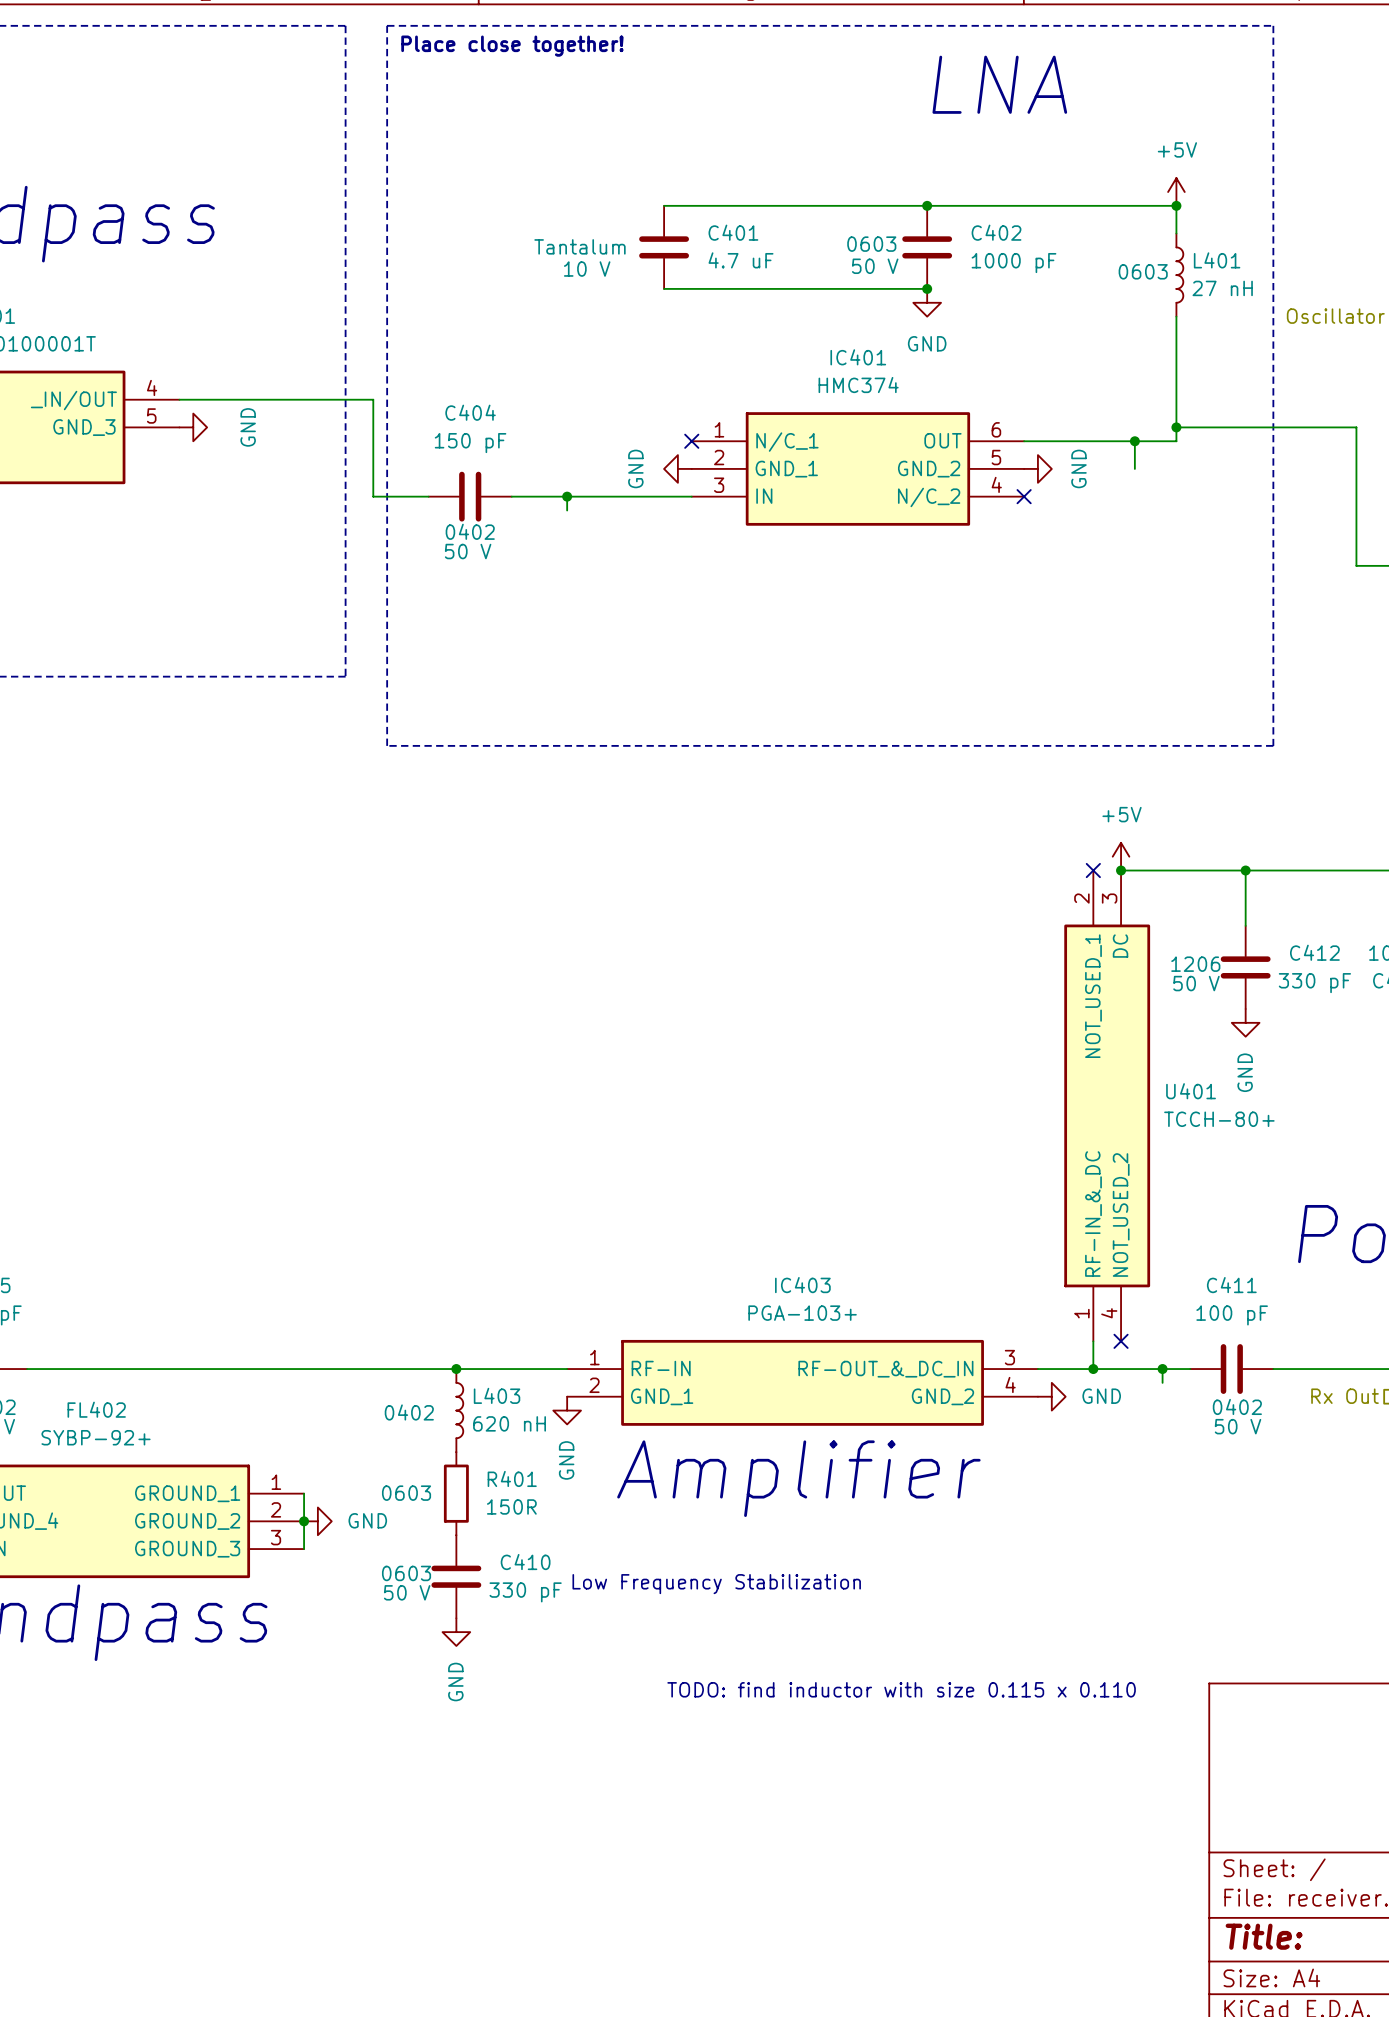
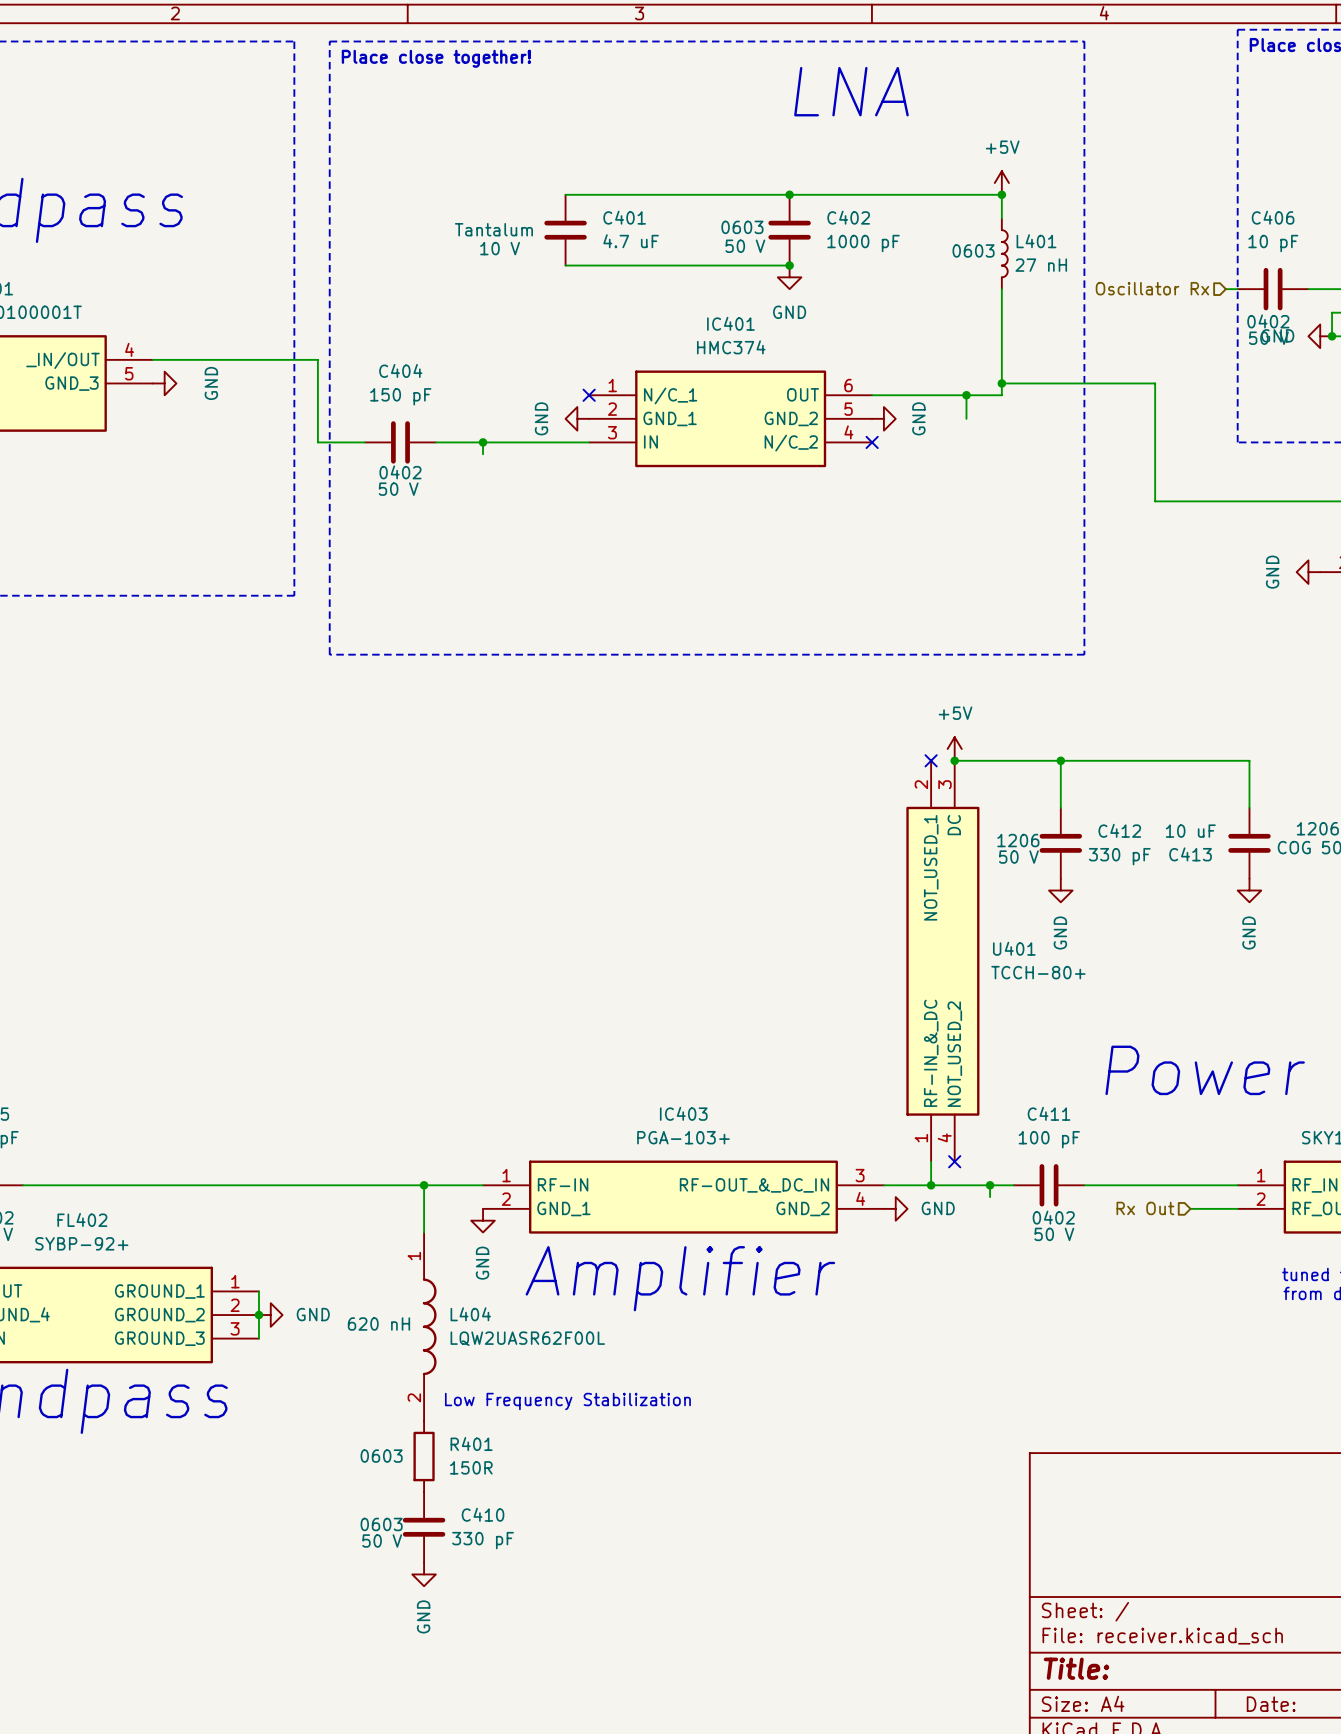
junction position: (456, 1369) -> (424, 1185)
wire: none -> (424, 1185) (424, 1232)
L403: 620 nH (459, 1410) -> none
R401 position: (456, 1493) -> (424, 1456)
L404: none -> LQW2UASR62F00L (429, 1326)
C410 position: (456, 1576) -> (424, 1527)
text position: Low Frequency Stabilization (716, 1584) -> Low Frequency Stabilization (567, 1401)
power symbol position: GND (456, 1632) -> GND (424, 1574)
text: TODO: find inductor with size 0.115 x 0.110 (901, 1689) -> none

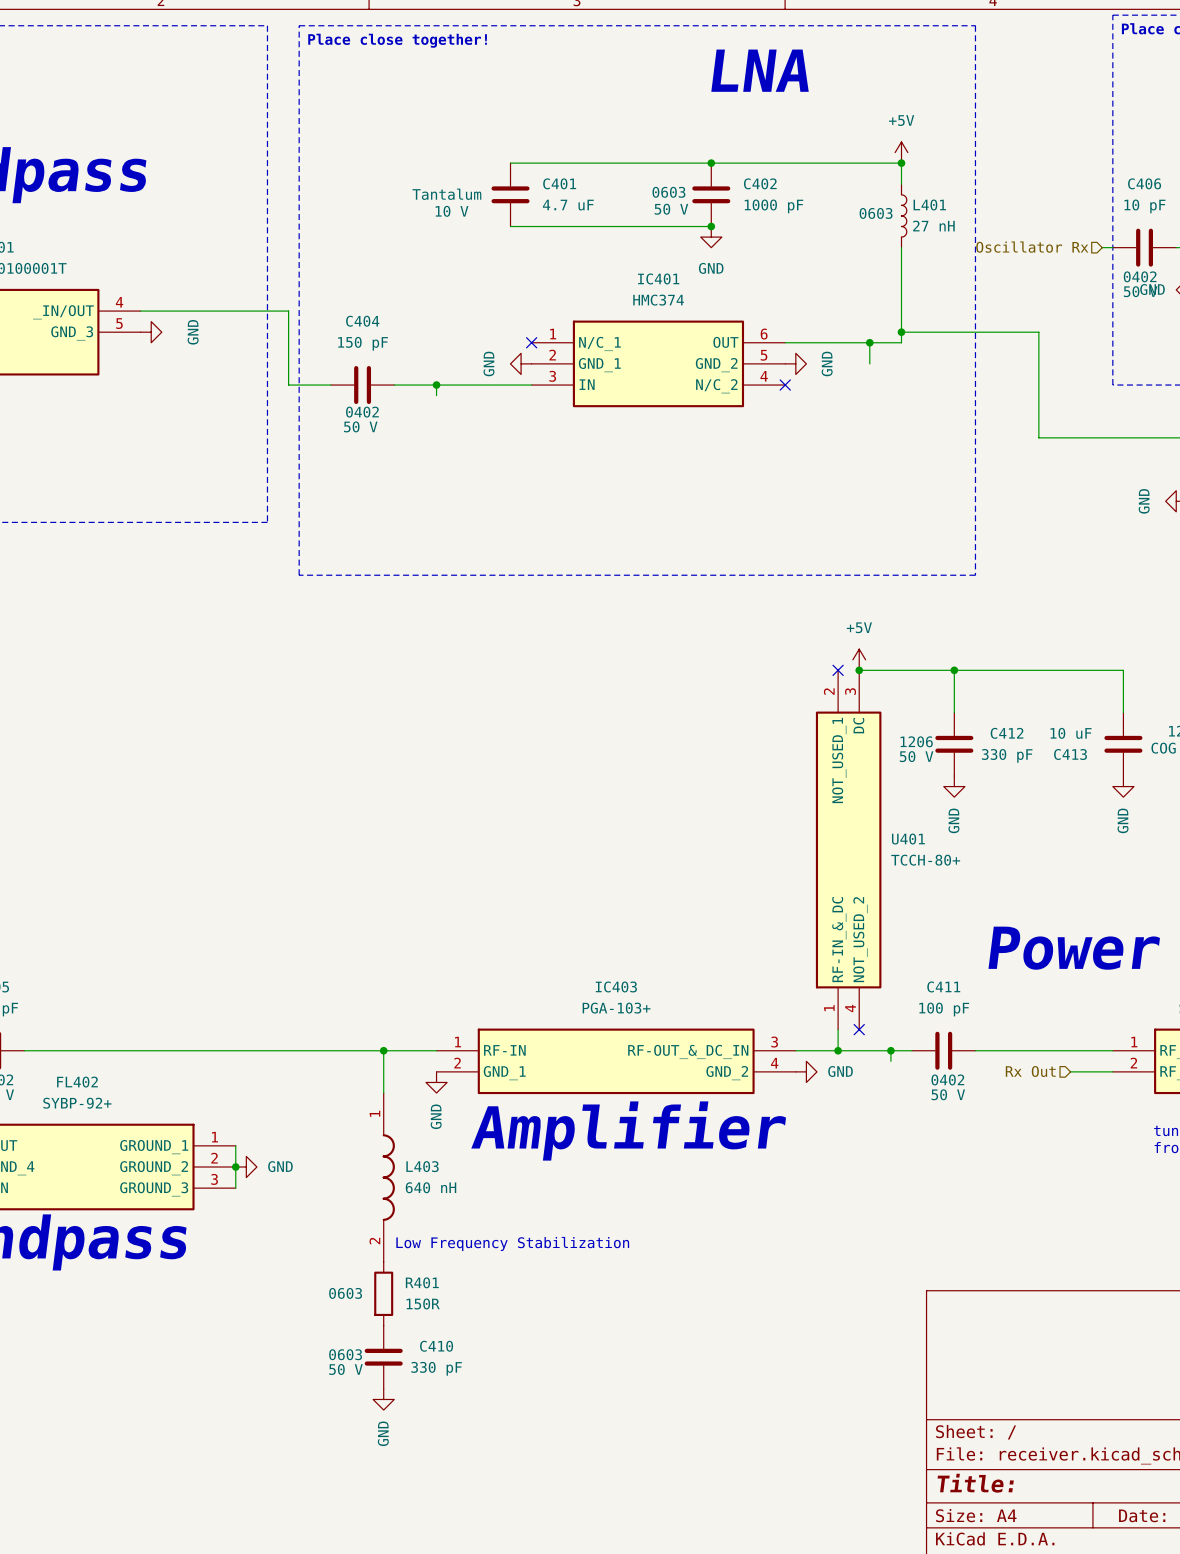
L404 name: L404 (470, 1314) -> L403 (422, 1166)
L404 text: 620 nH (378, 1324) -> none
L404 value: LQW2UASR62F00L (527, 1338) -> 640 nH (431, 1187)

